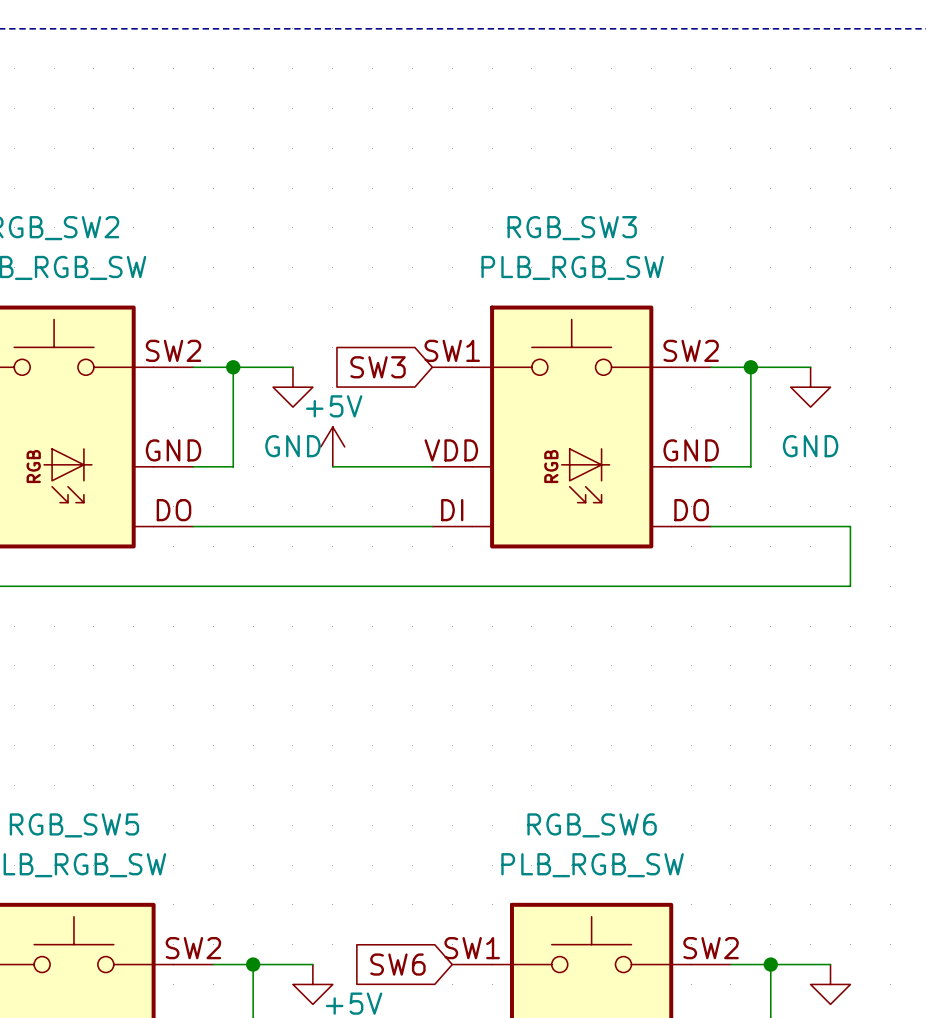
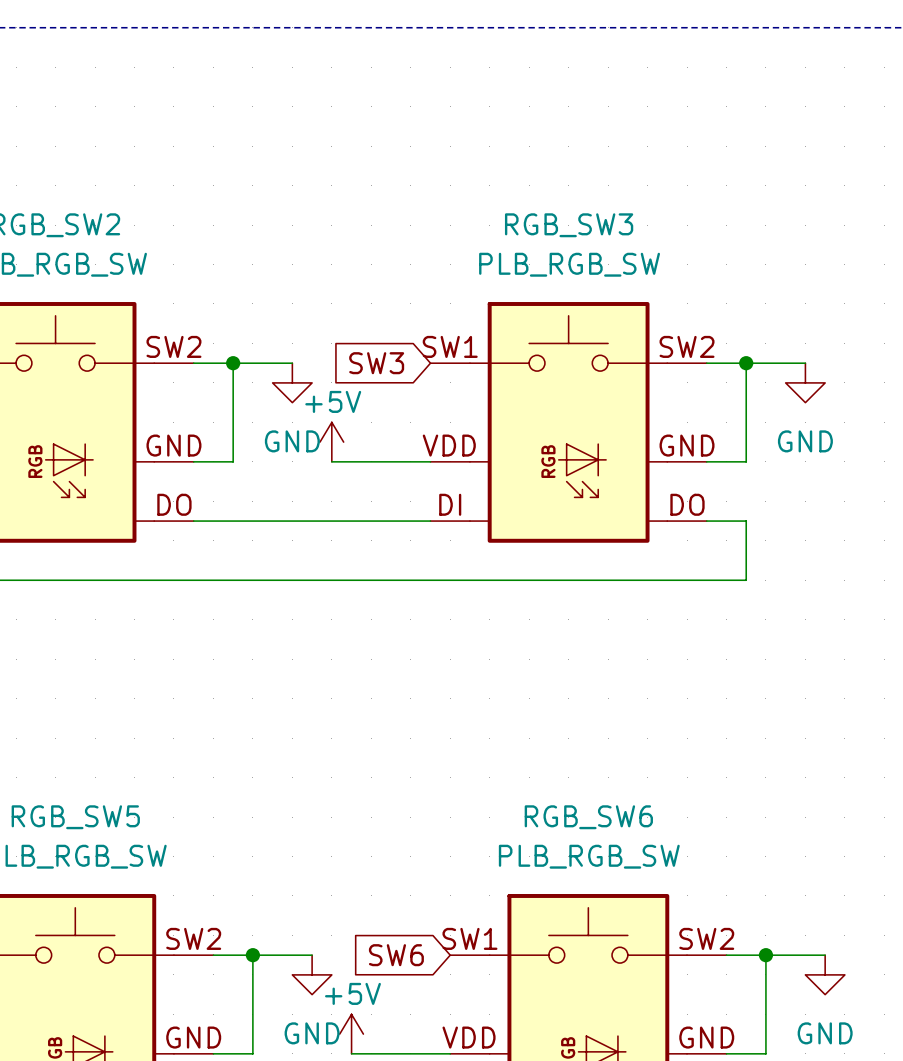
wire: (750, 526) (850, 526) (850, 586) (750, 586) -> (746, 521) (746, 580)

